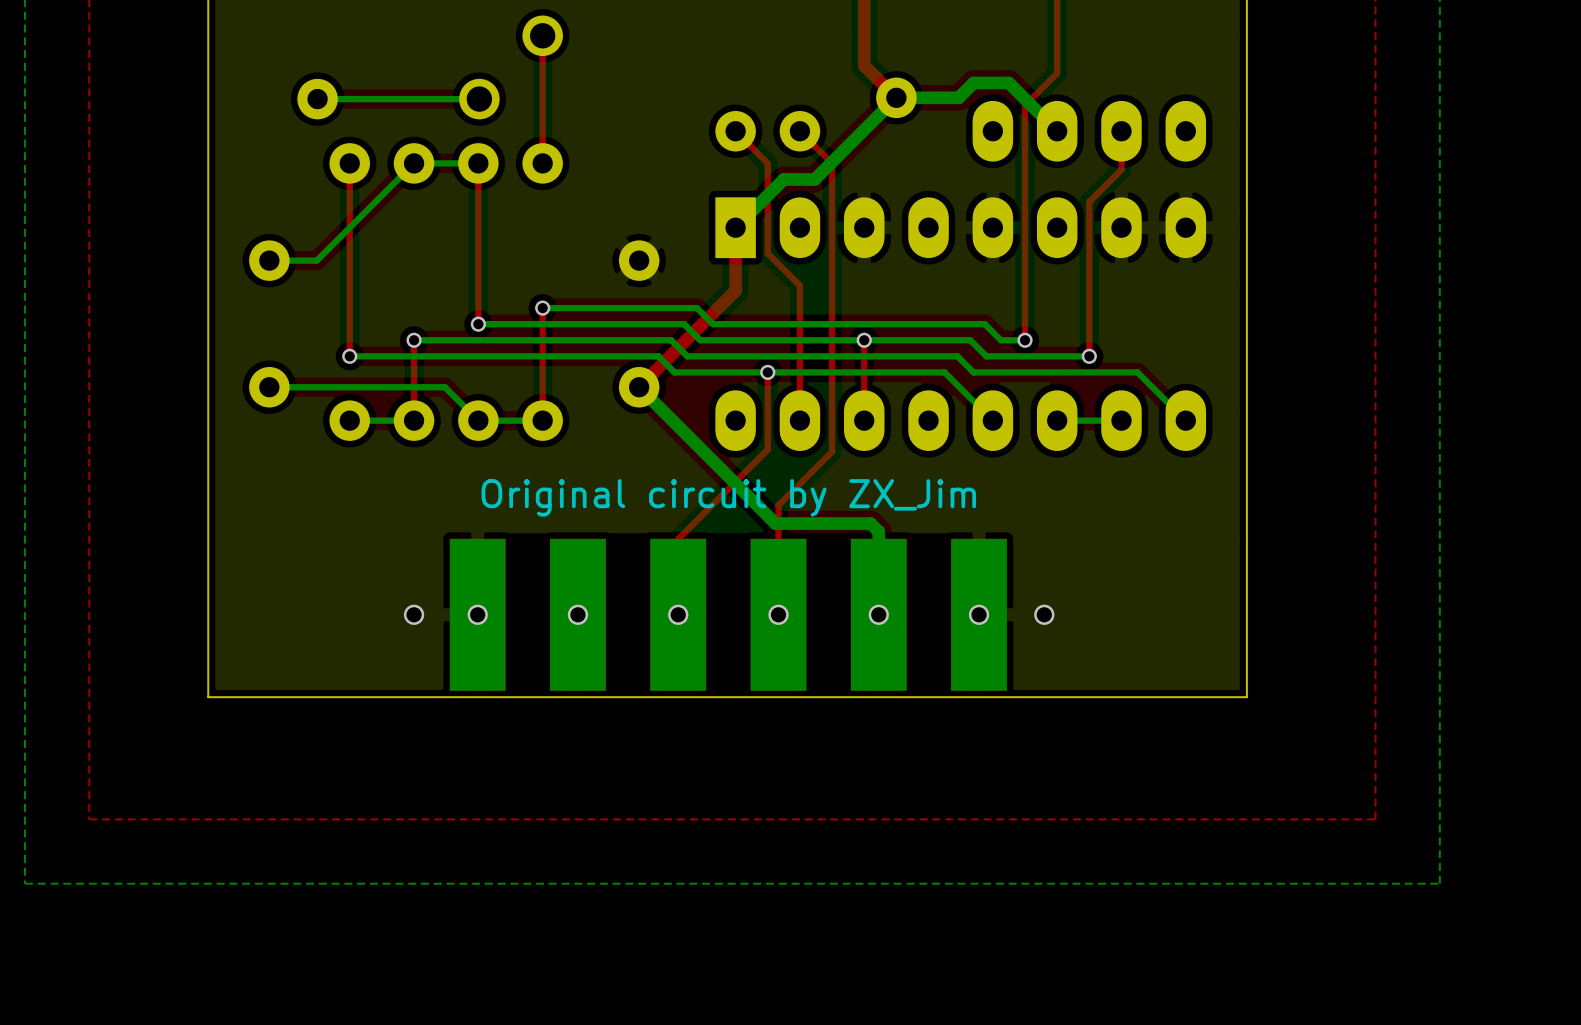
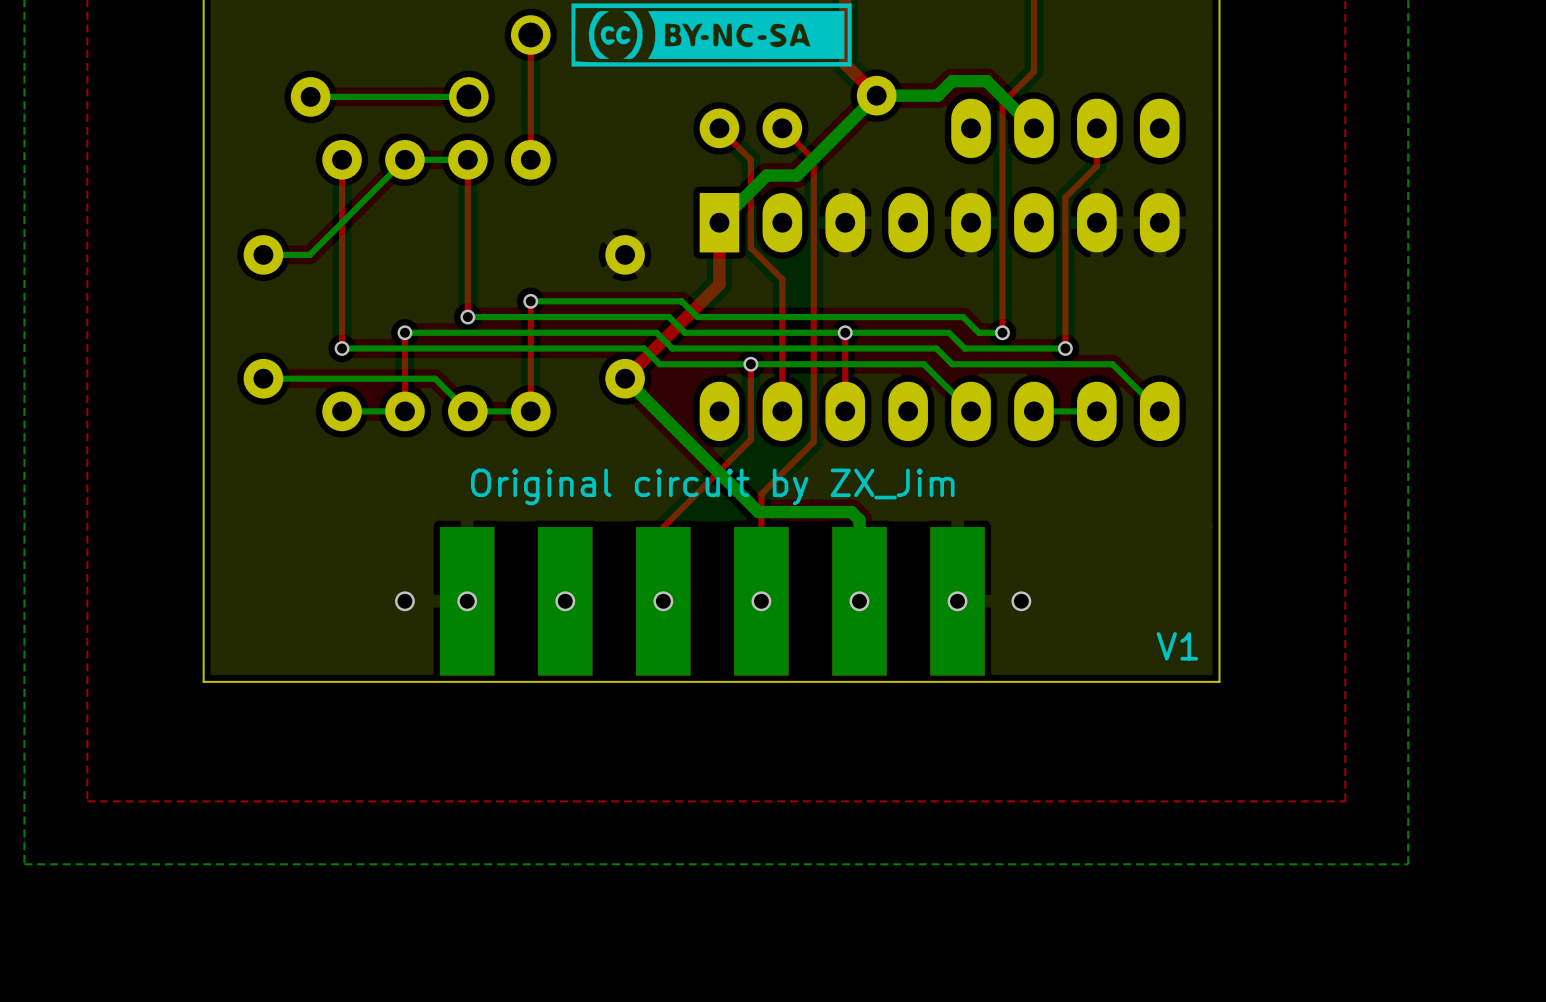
drawing: none -> [571, 3, 852, 67]
text: none -> V1 (1177, 646)

